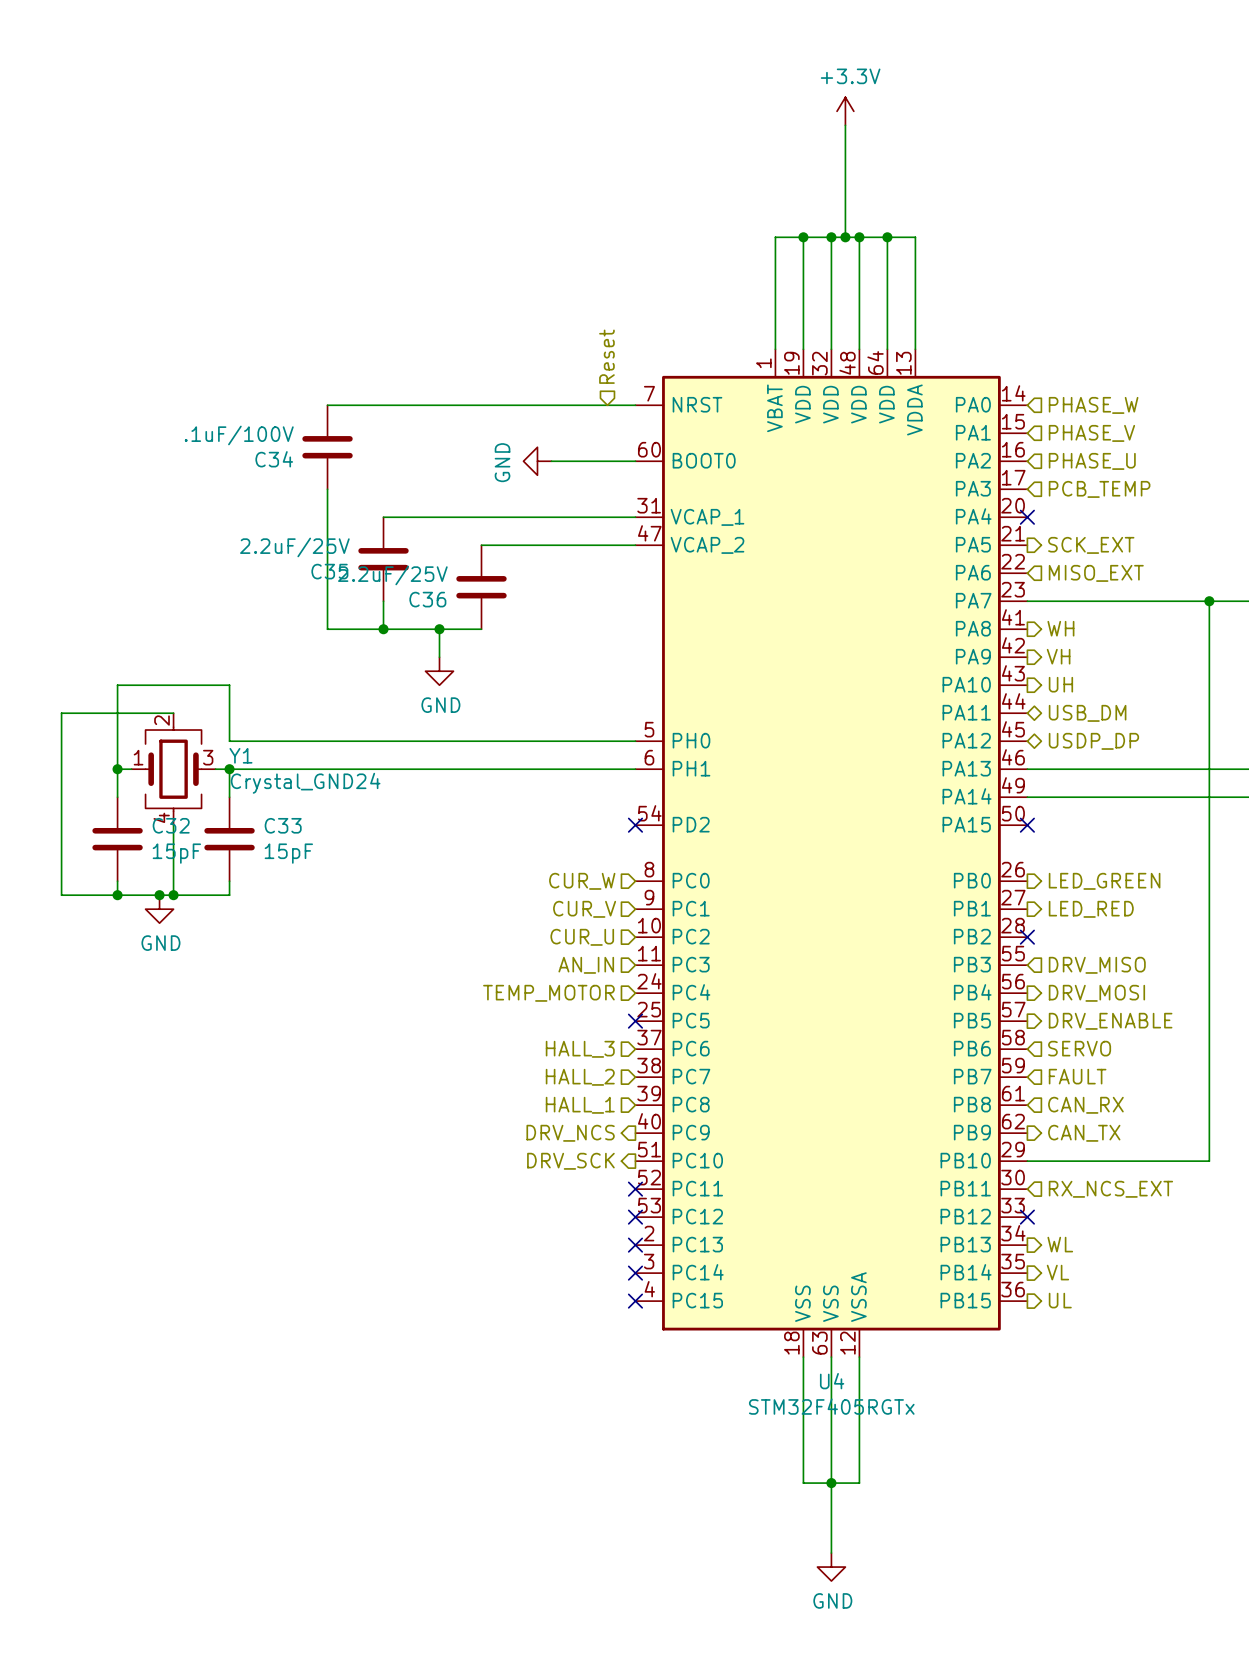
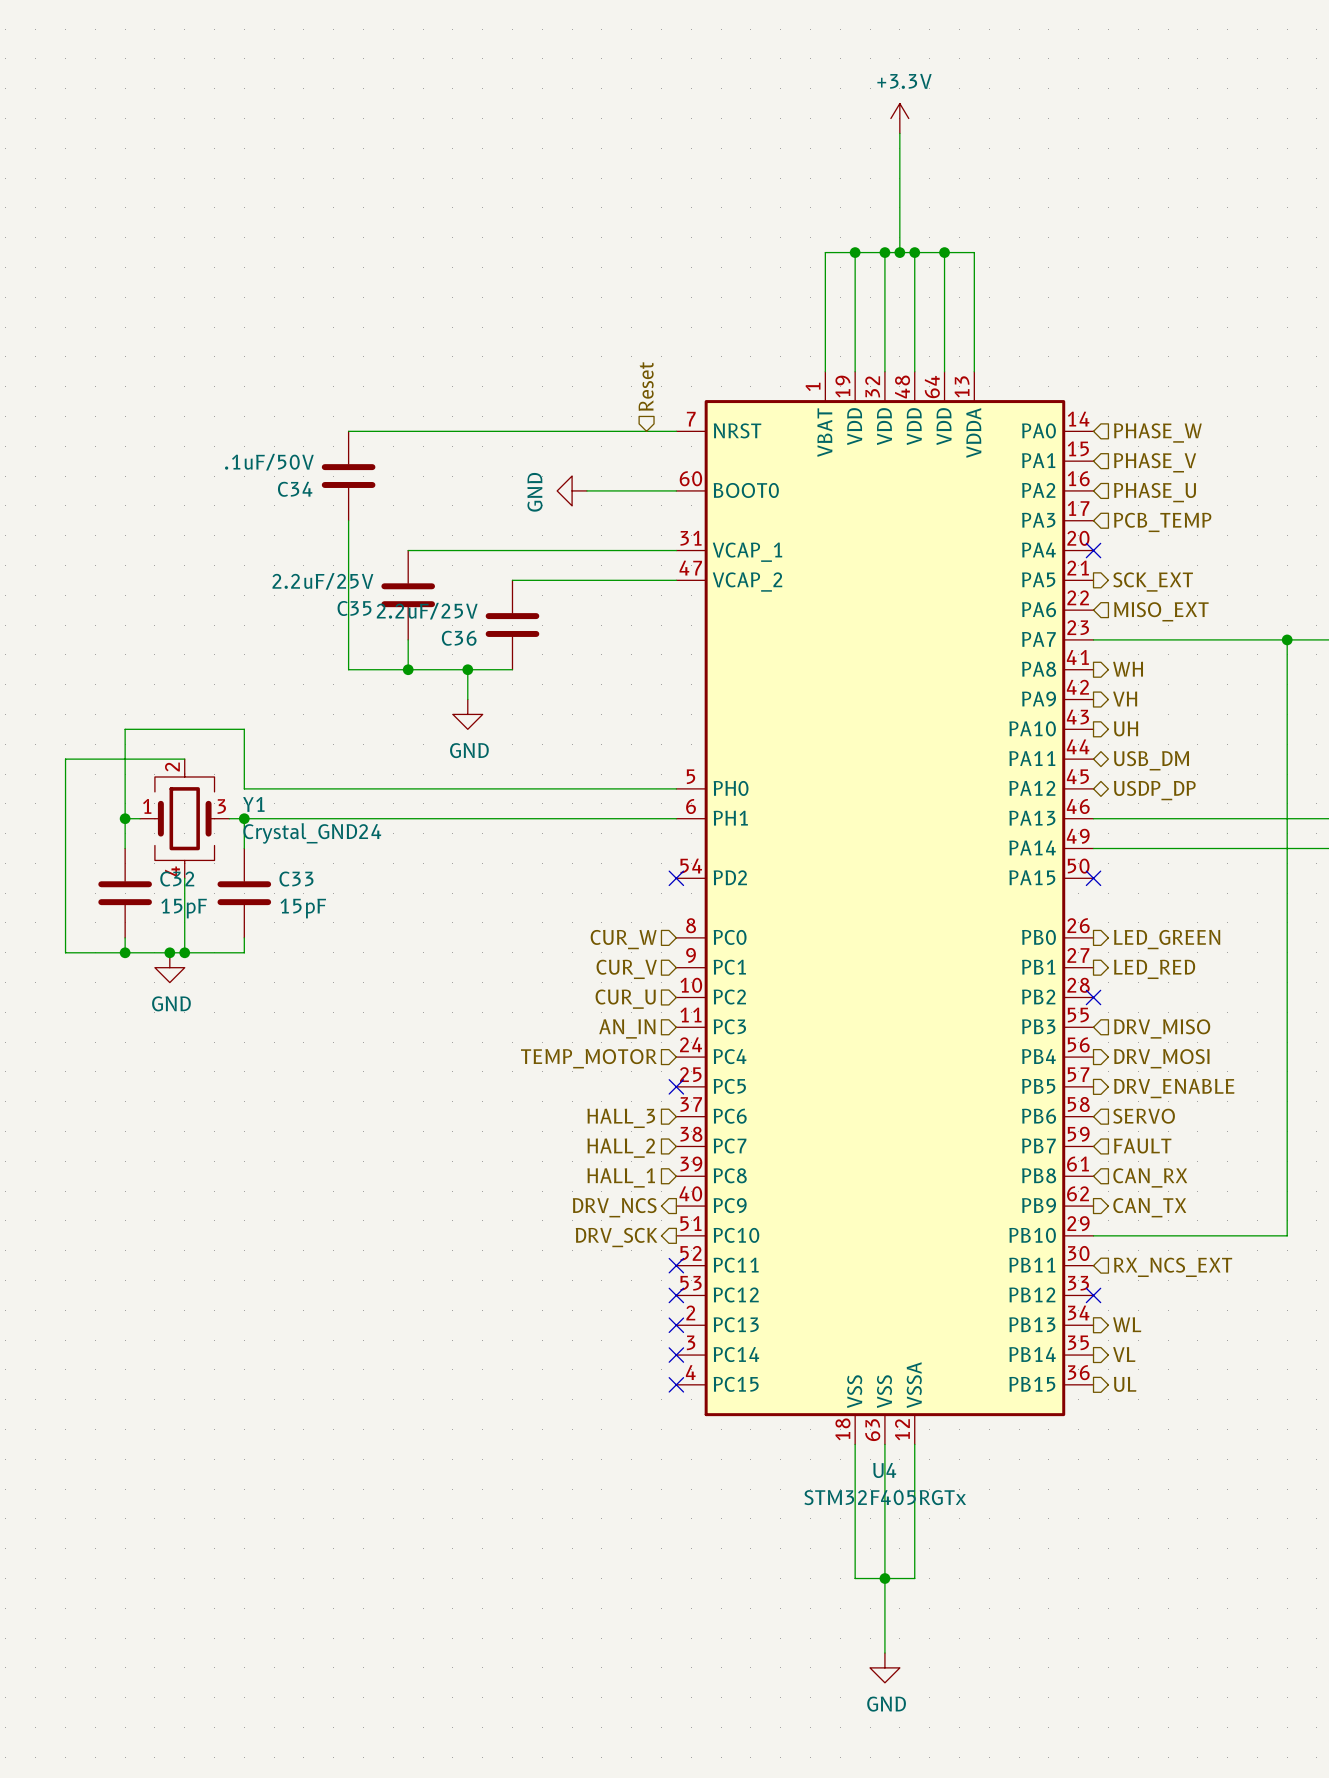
C34 value: .1uF/100V (239, 435) -> .1uF/50V (269, 462)

